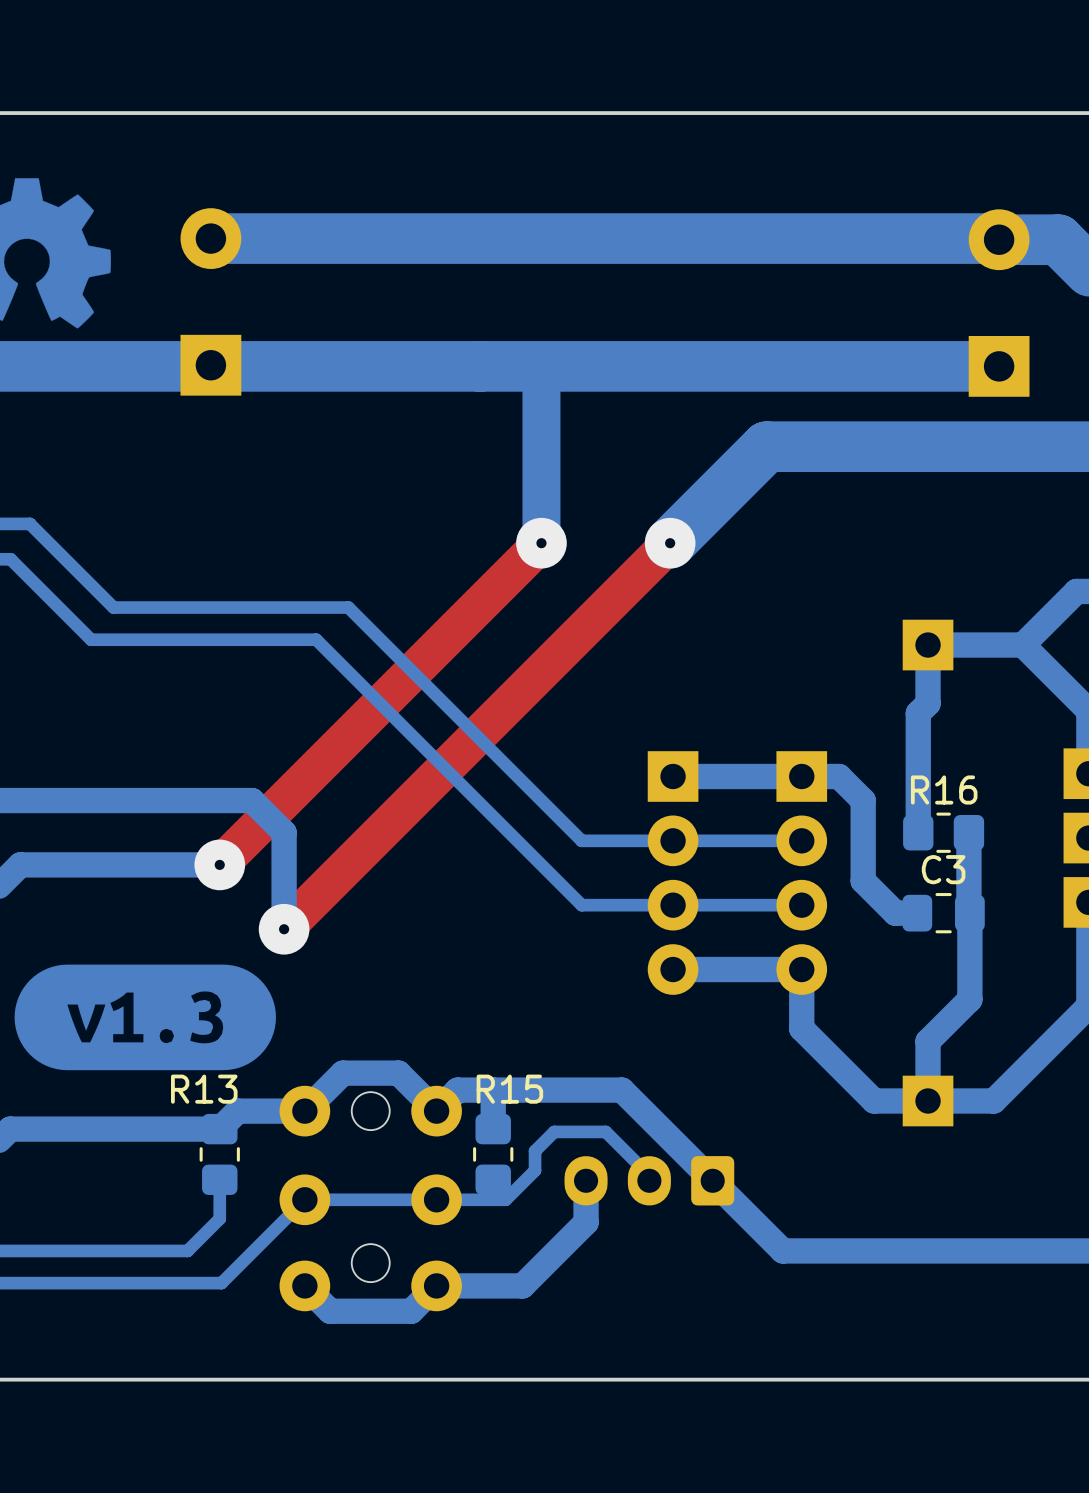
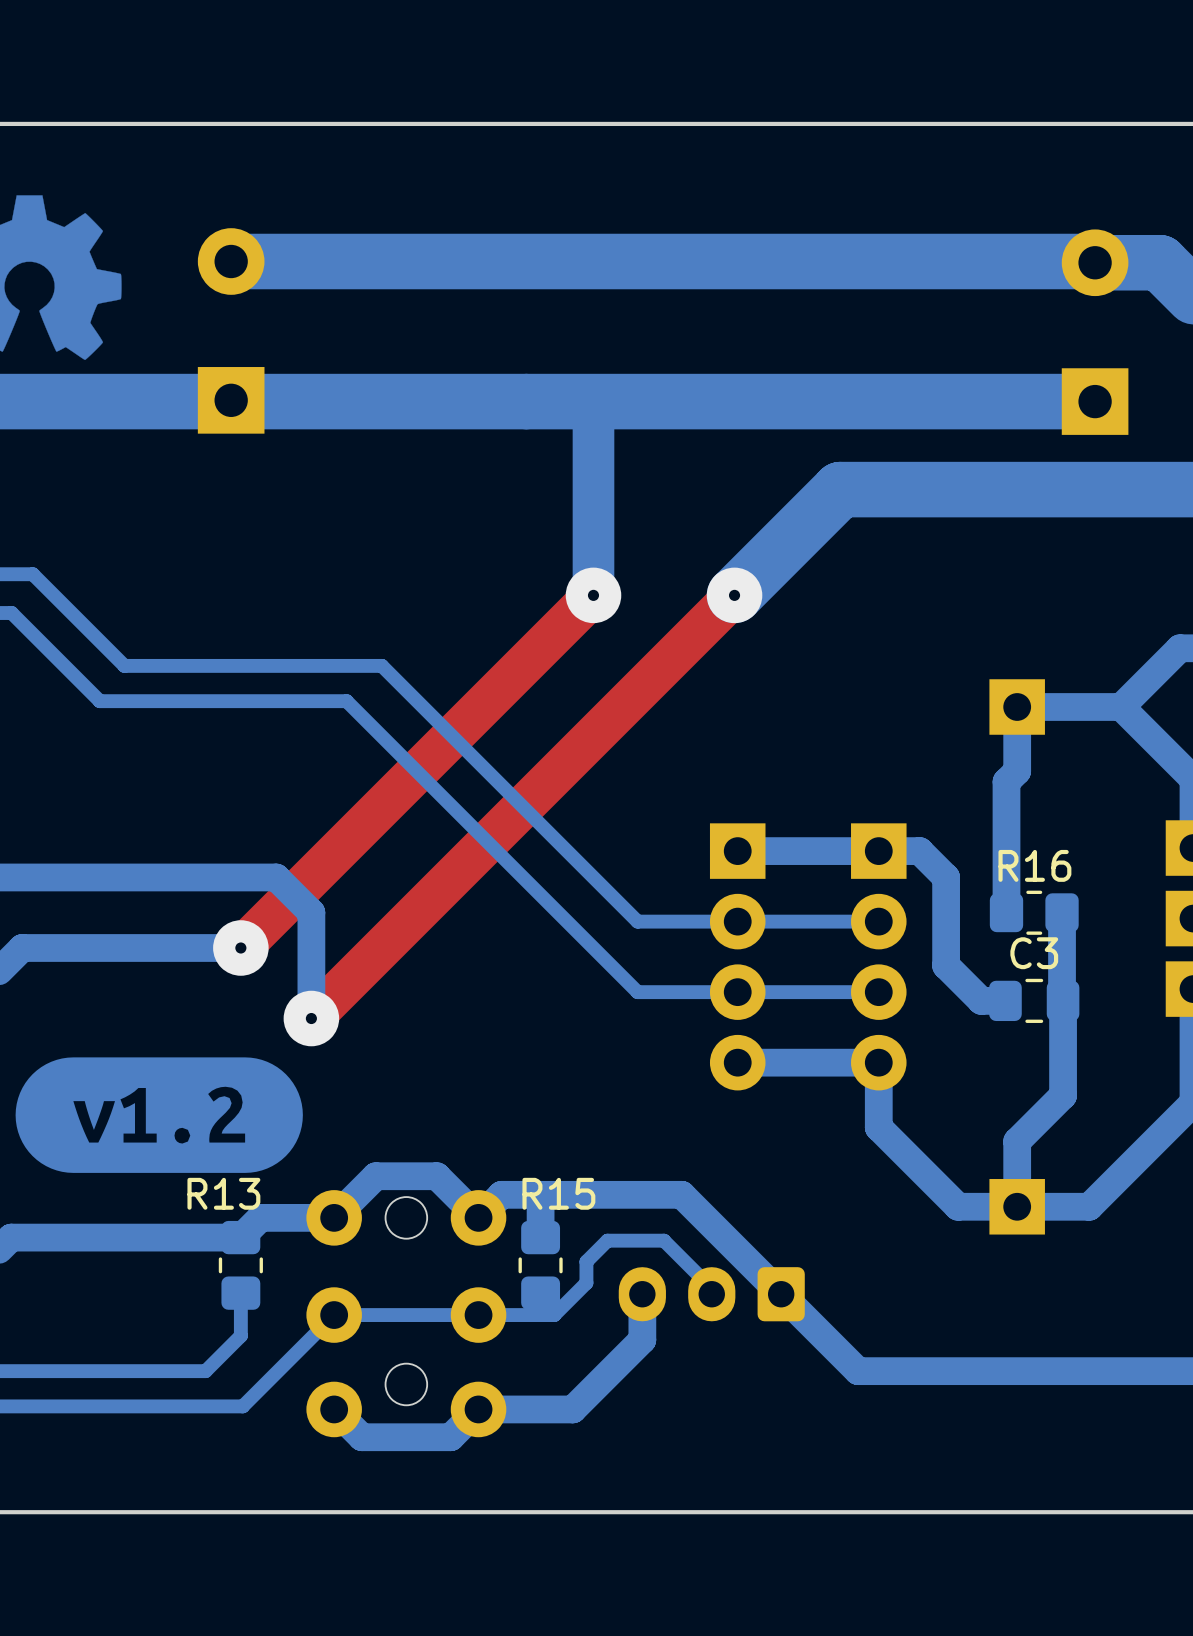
drawing shape: [14, 964, 276, 1071] -> [15, 1057, 303, 1173]

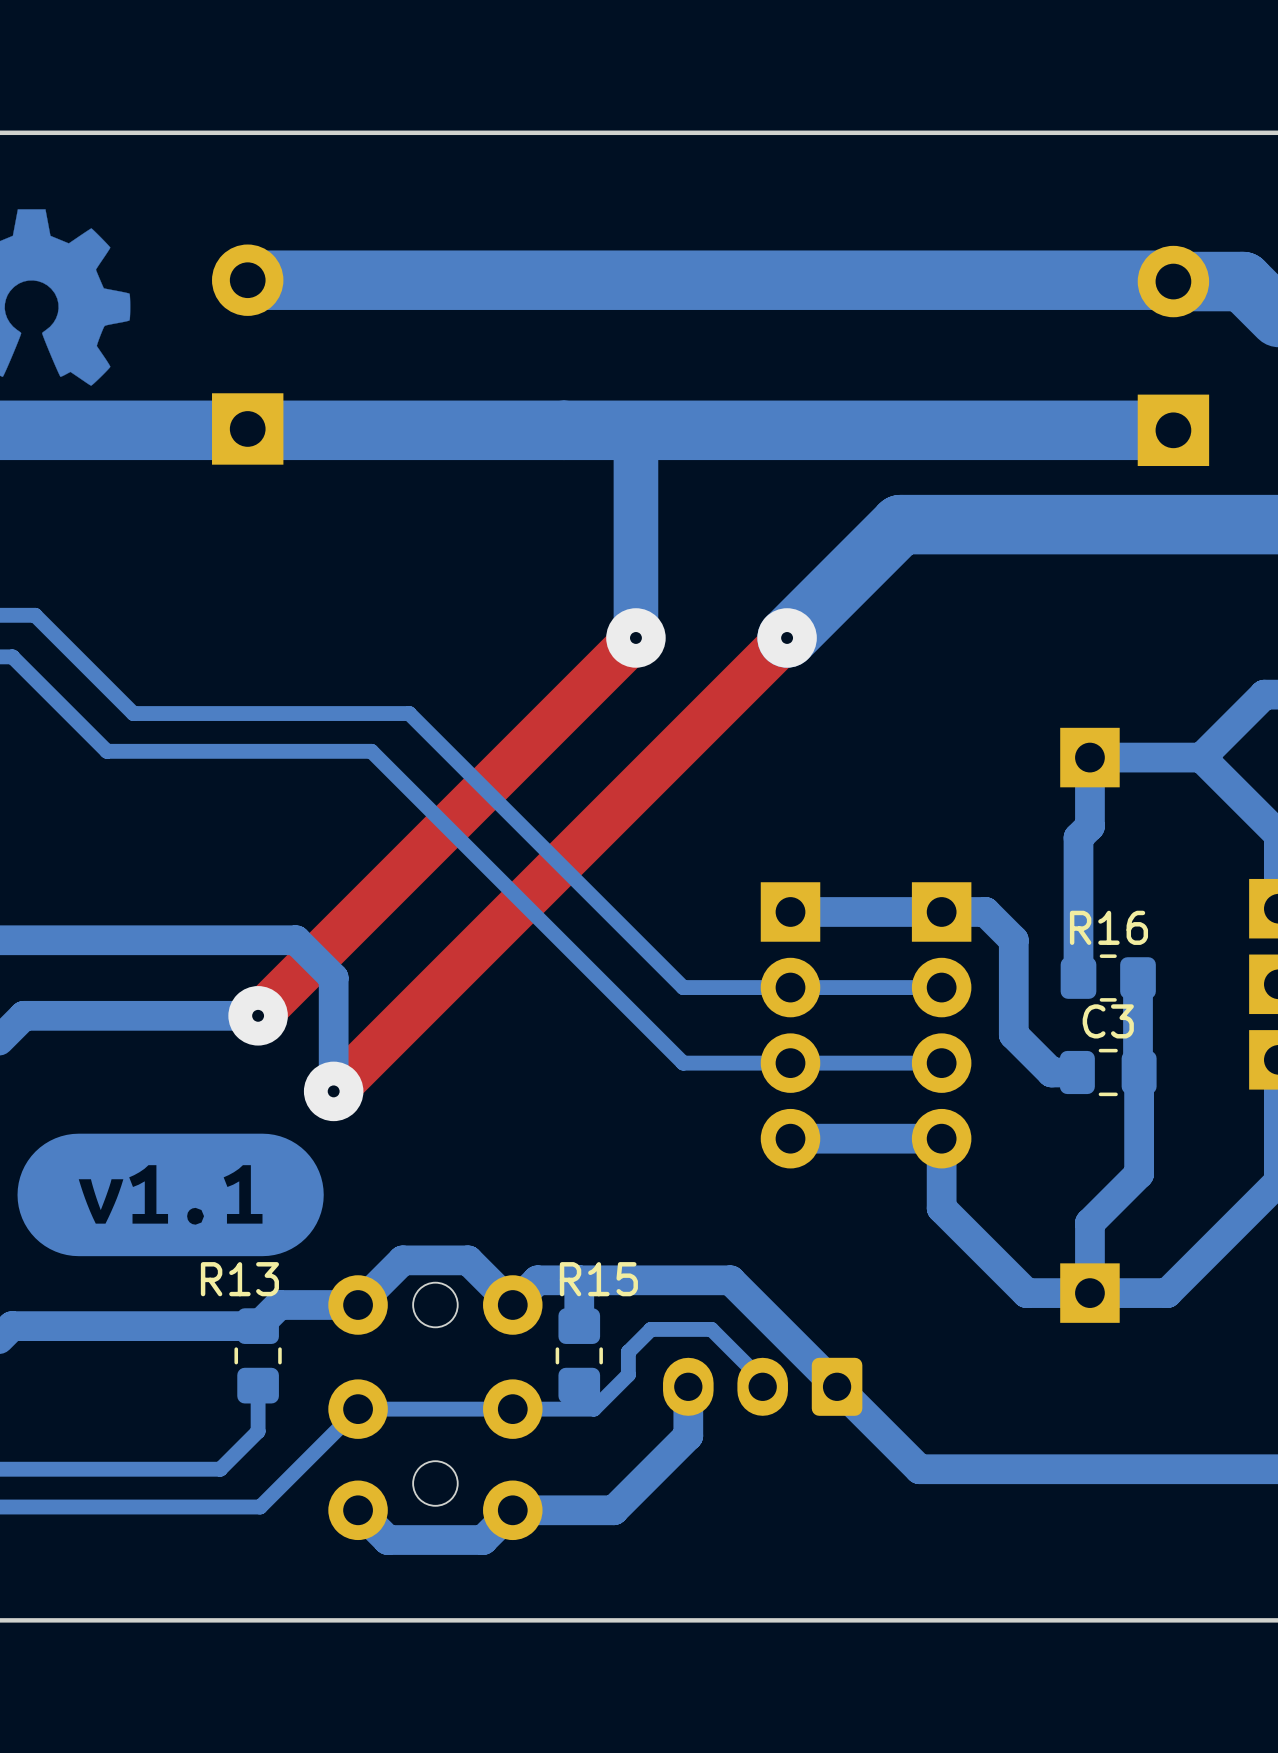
drawing shape: [15, 1057, 303, 1173] -> [17, 1133, 324, 1257]

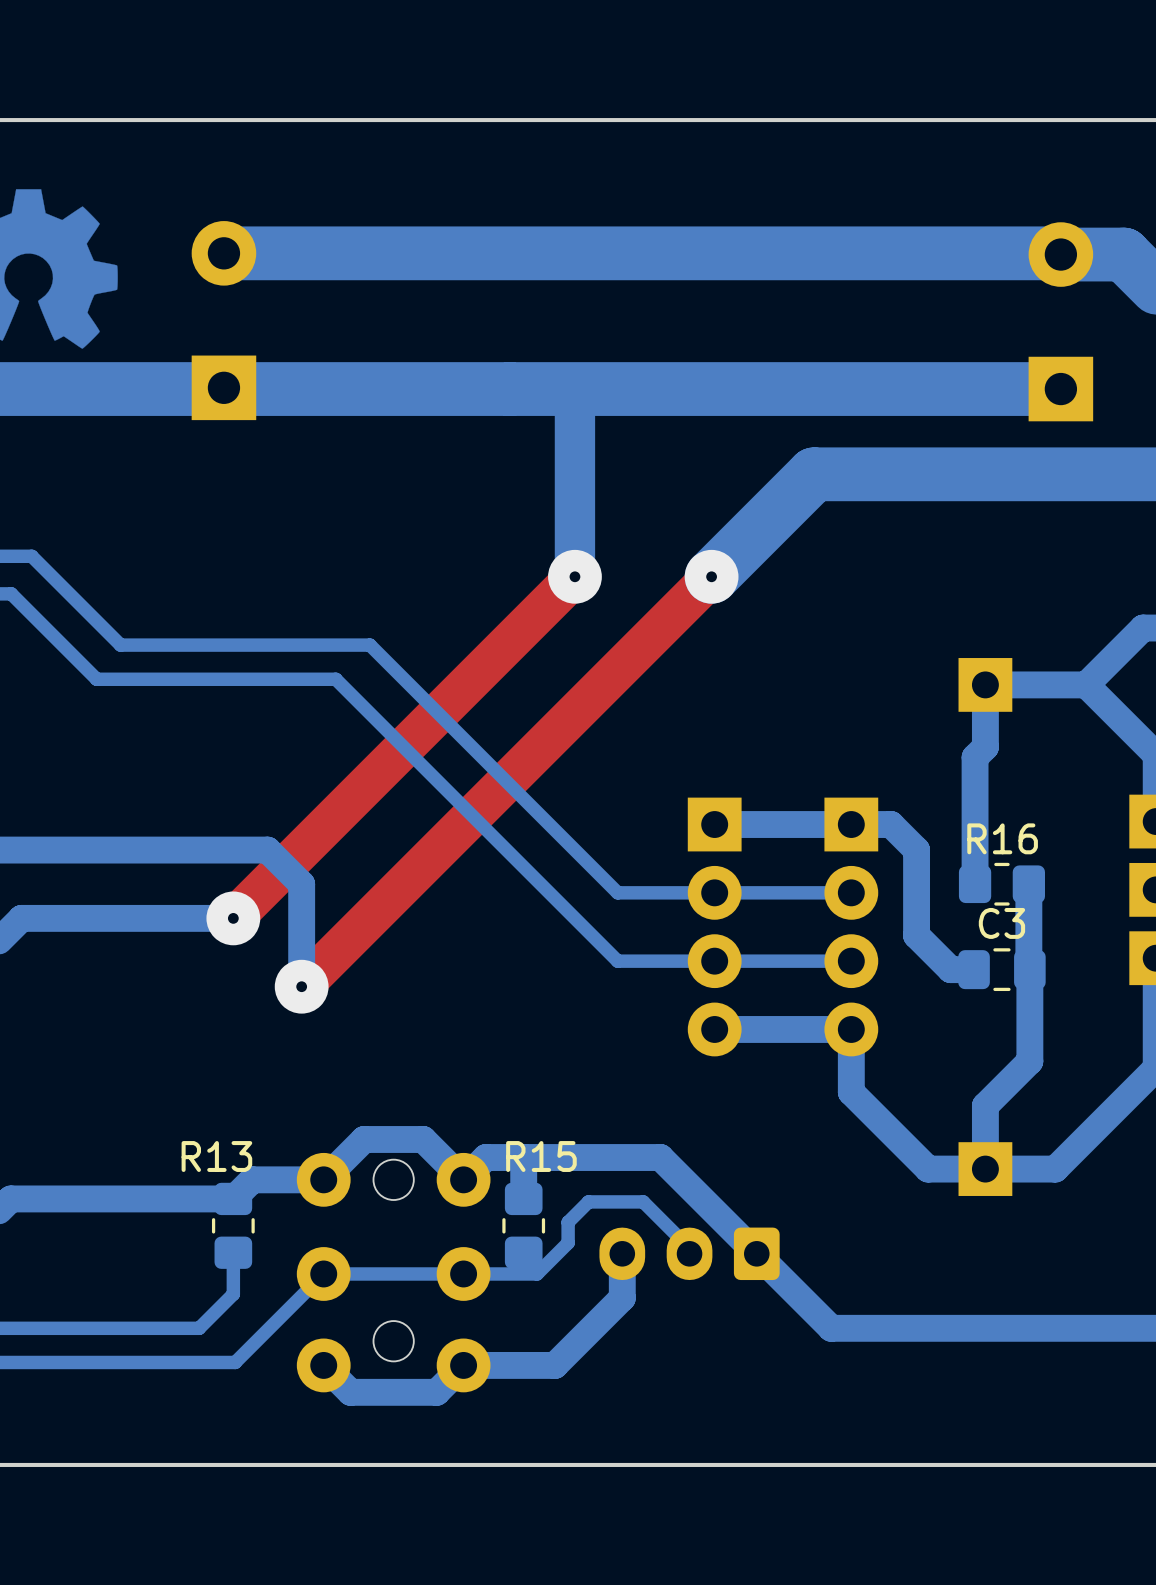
drawing: [17, 1133, 324, 1257] -> none

